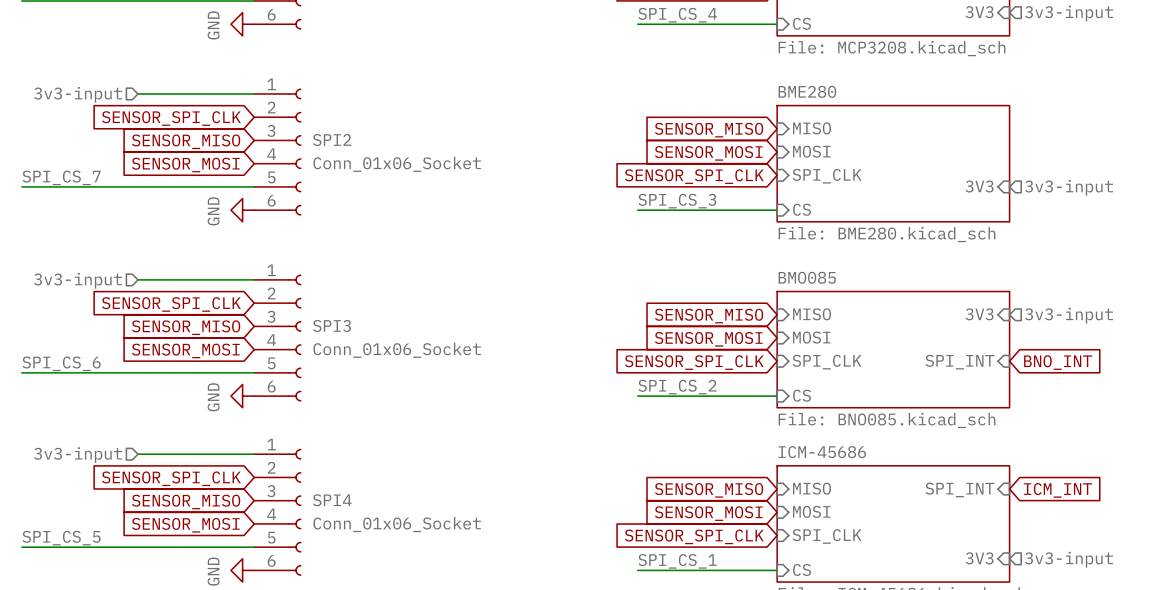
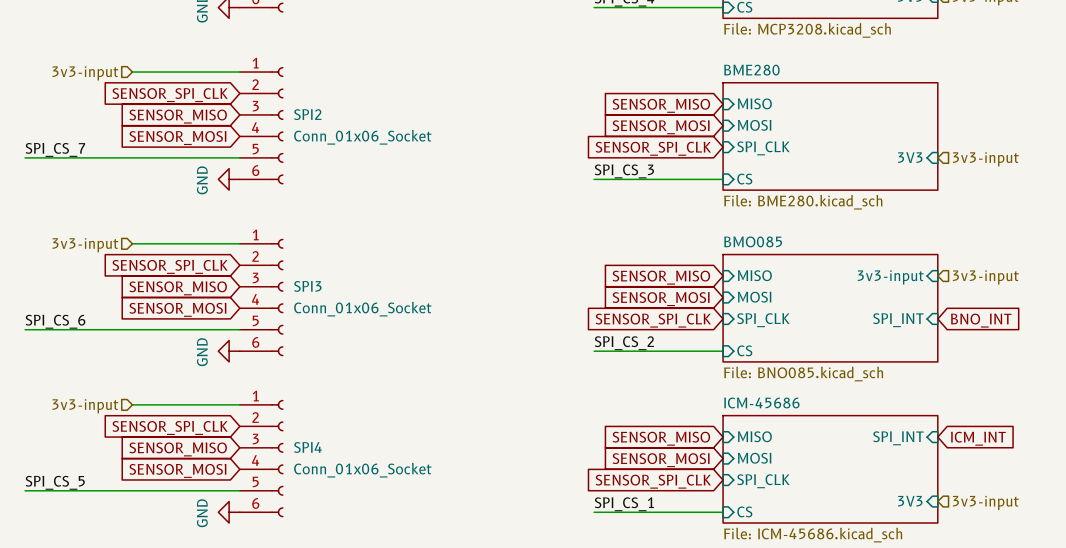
sheet pin: 3V3 (979, 314) -> 3v3-input (890, 277)

